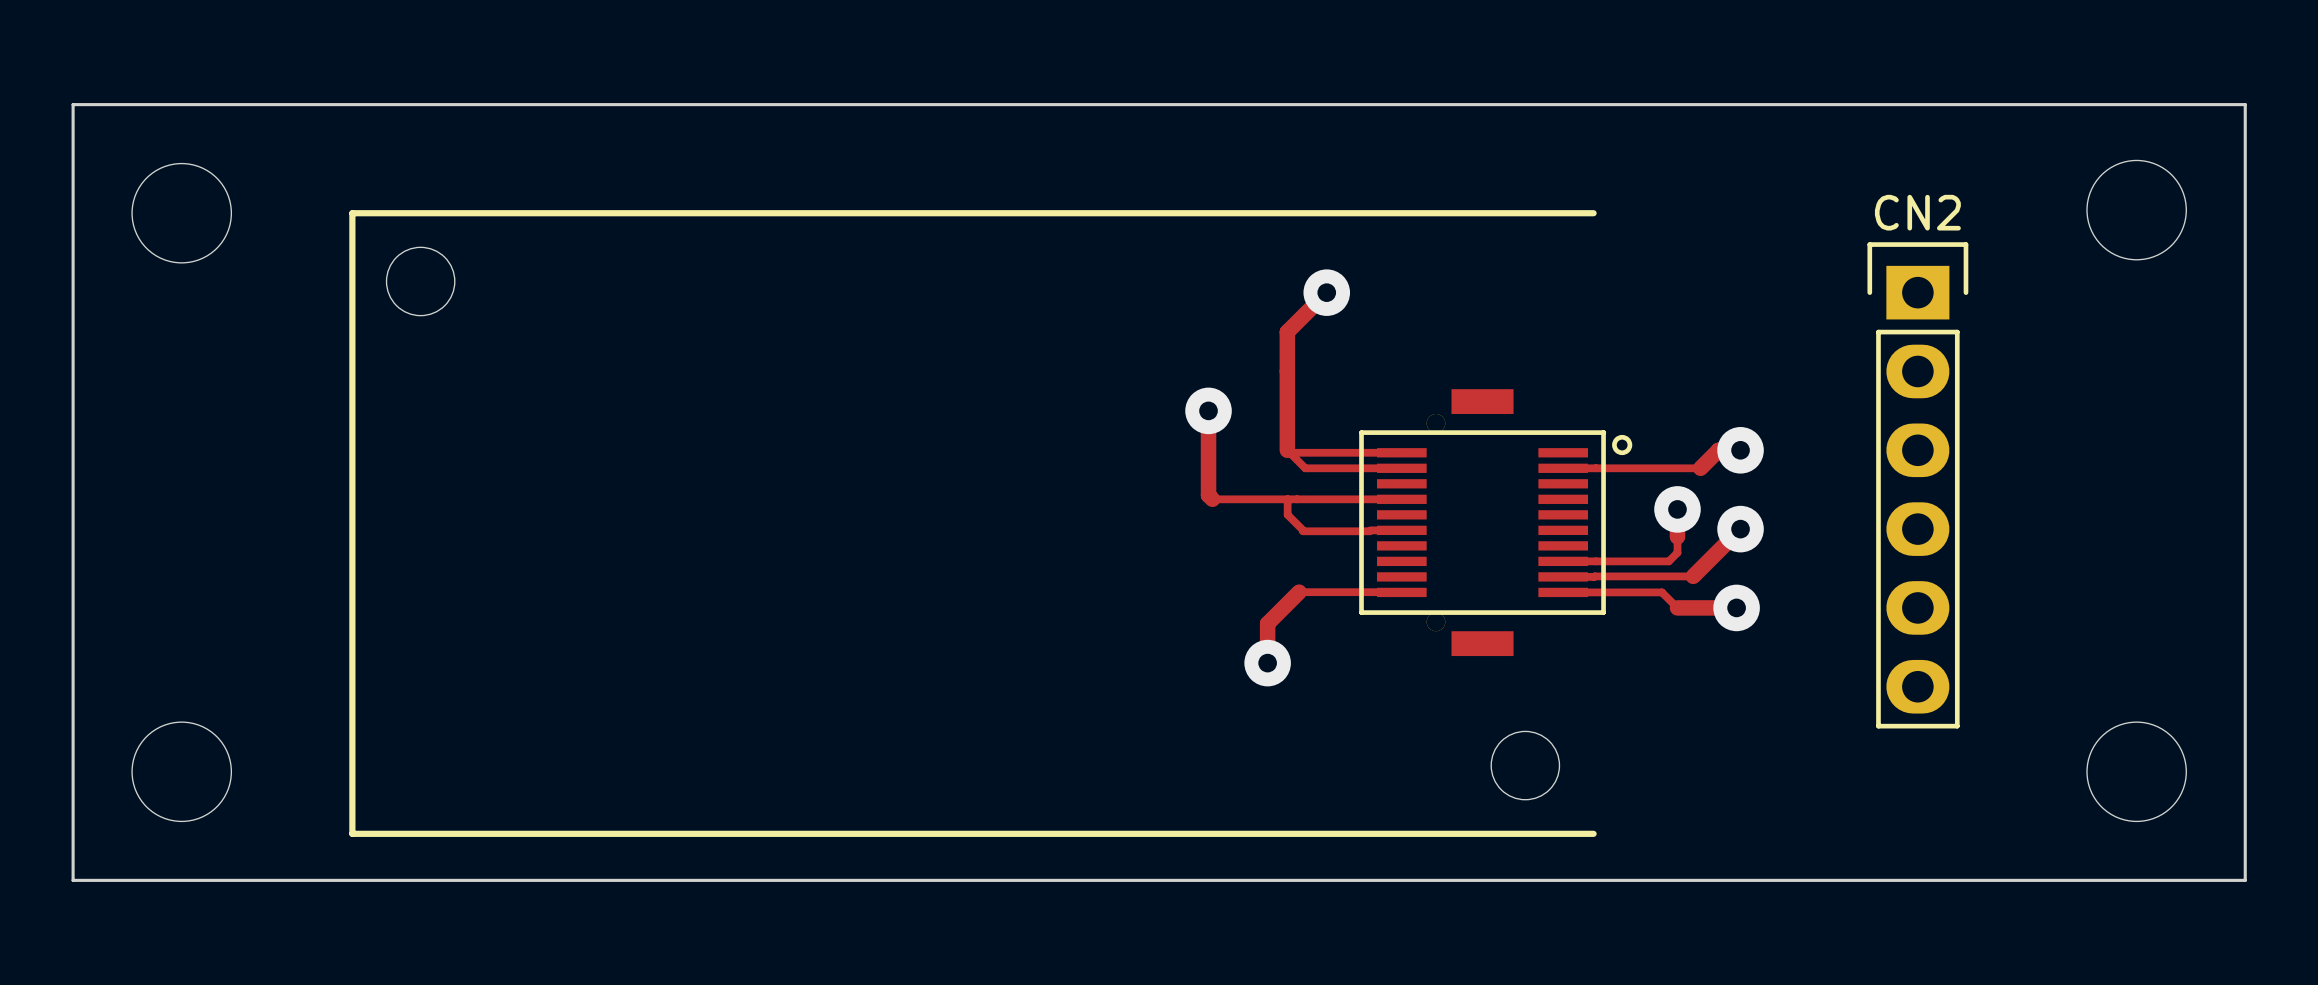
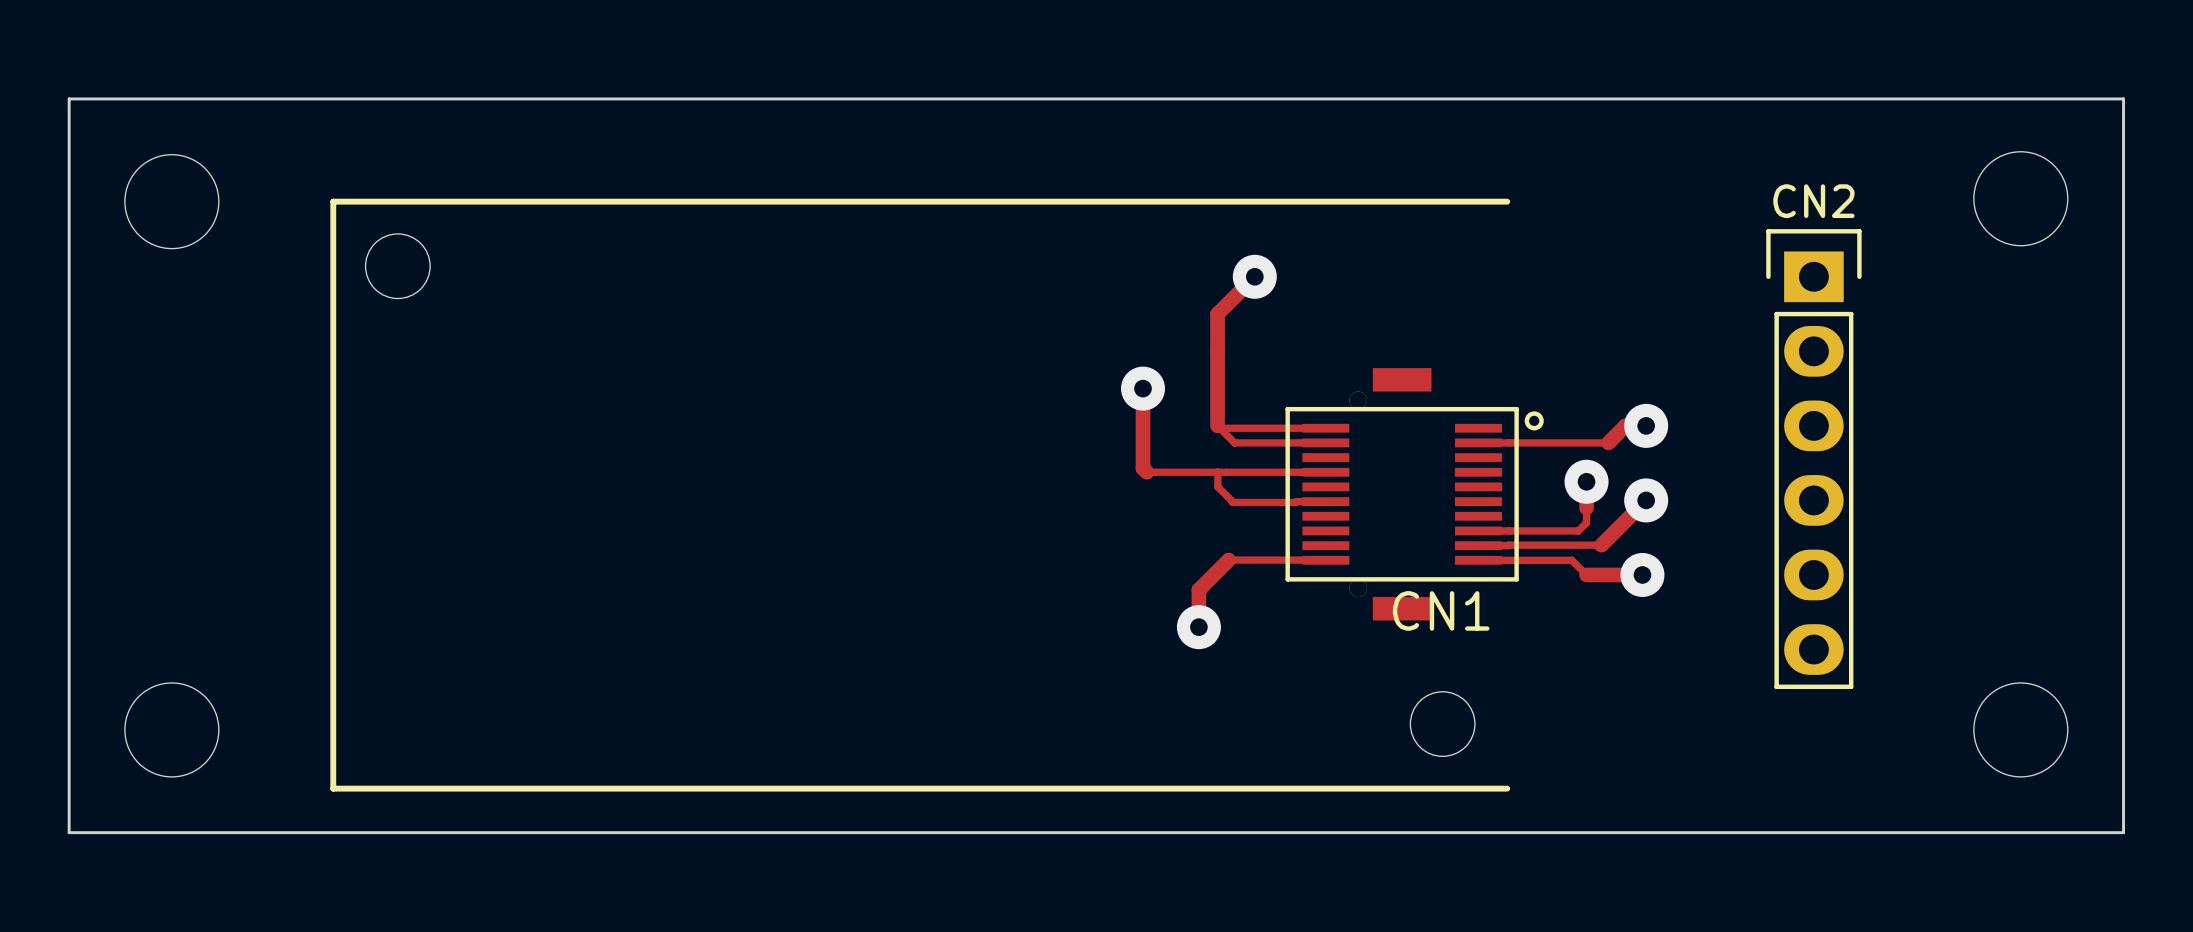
CN1 name: none -> CN1 (1441, 610)

